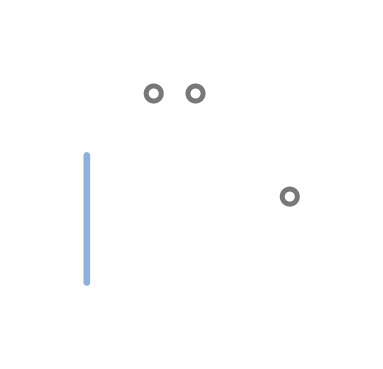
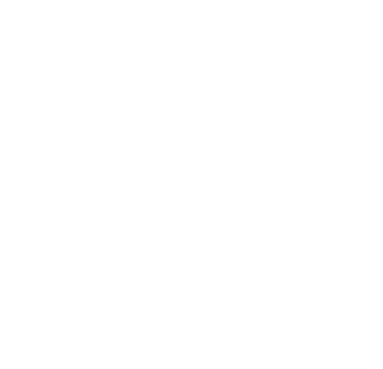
via: (153, 93) -> none
via: (195, 93) -> none
track: (86, 155) (86, 282) -> none
via: (289, 196) -> none

